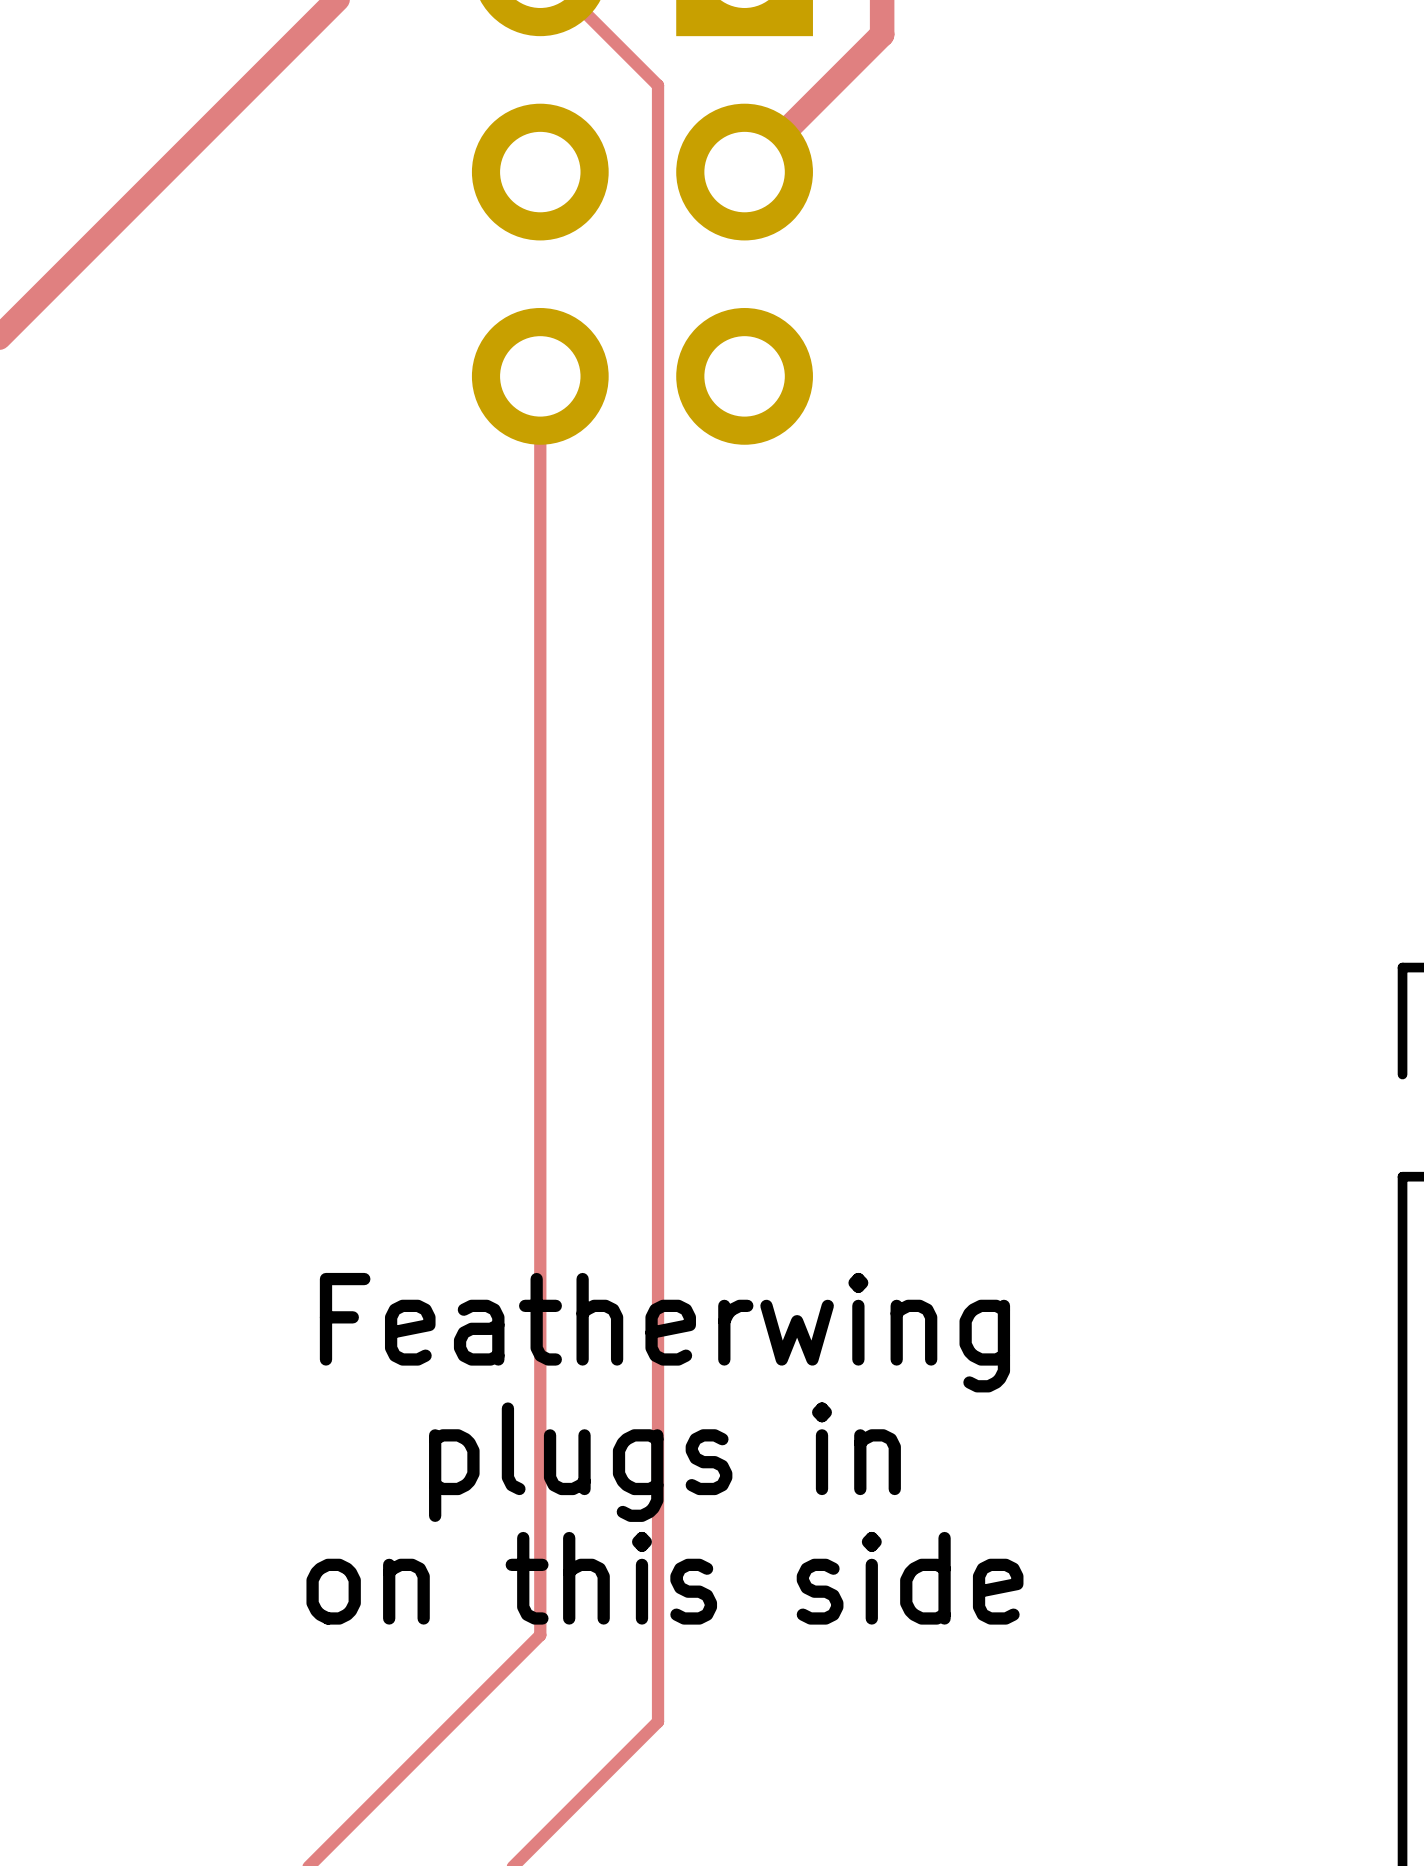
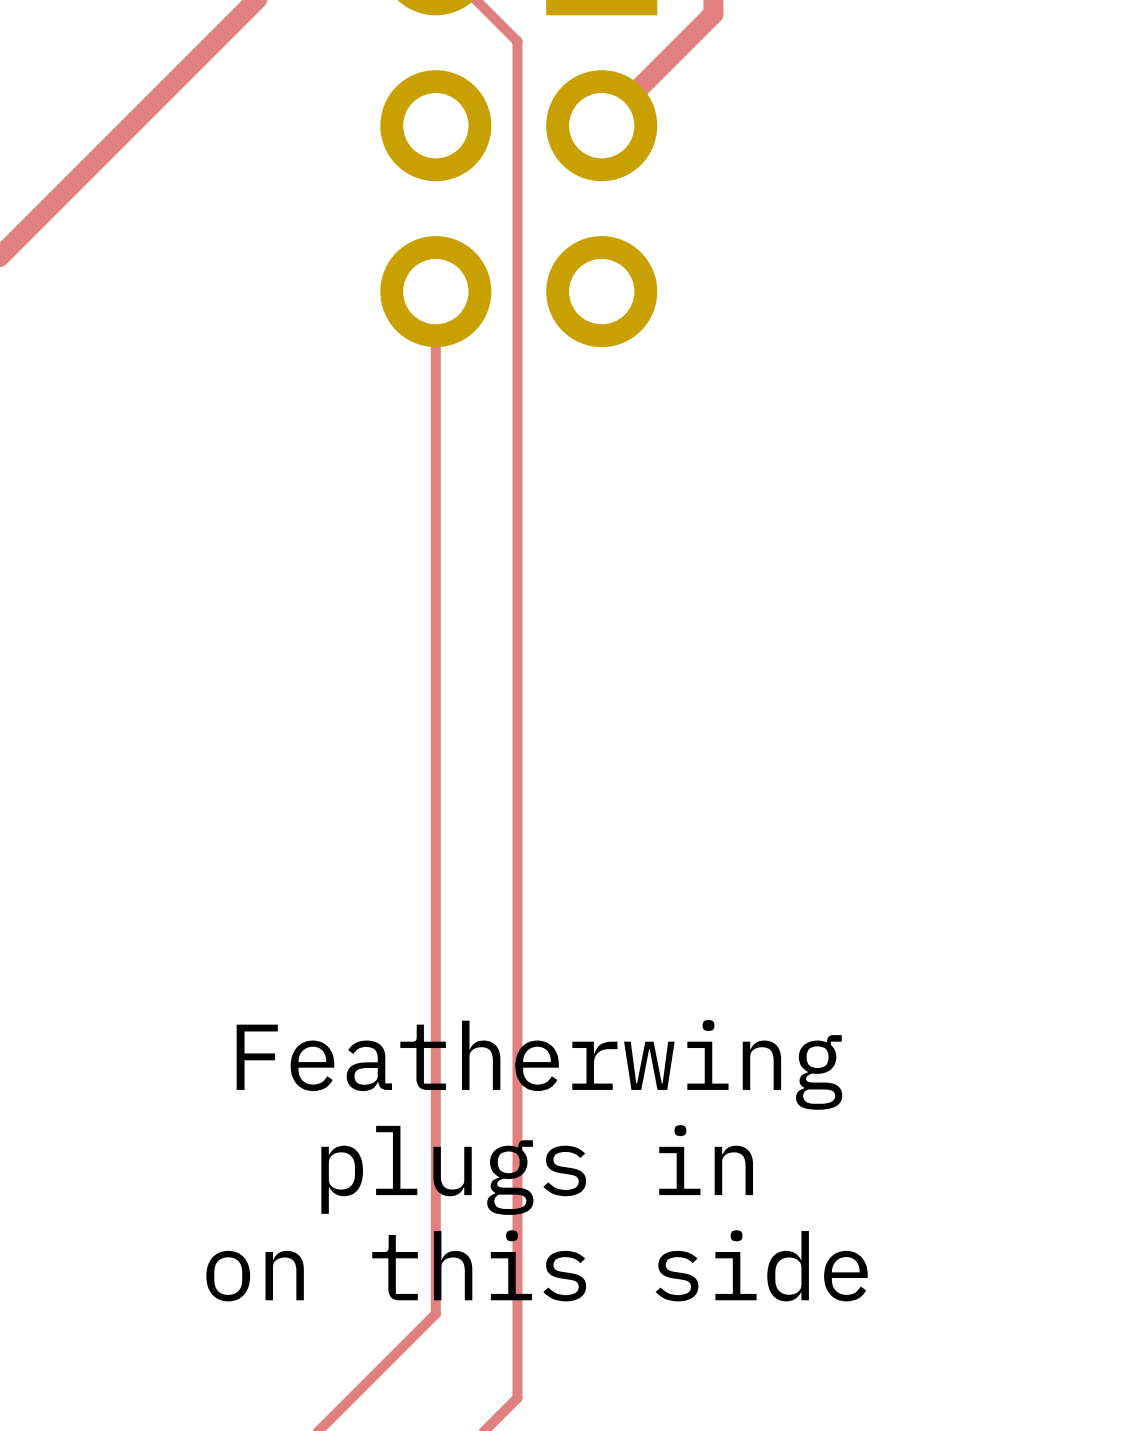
track: (640, 68) (658, 85) (658, 1721) (640, 1738) -> (517, 41) (517, 1398)

